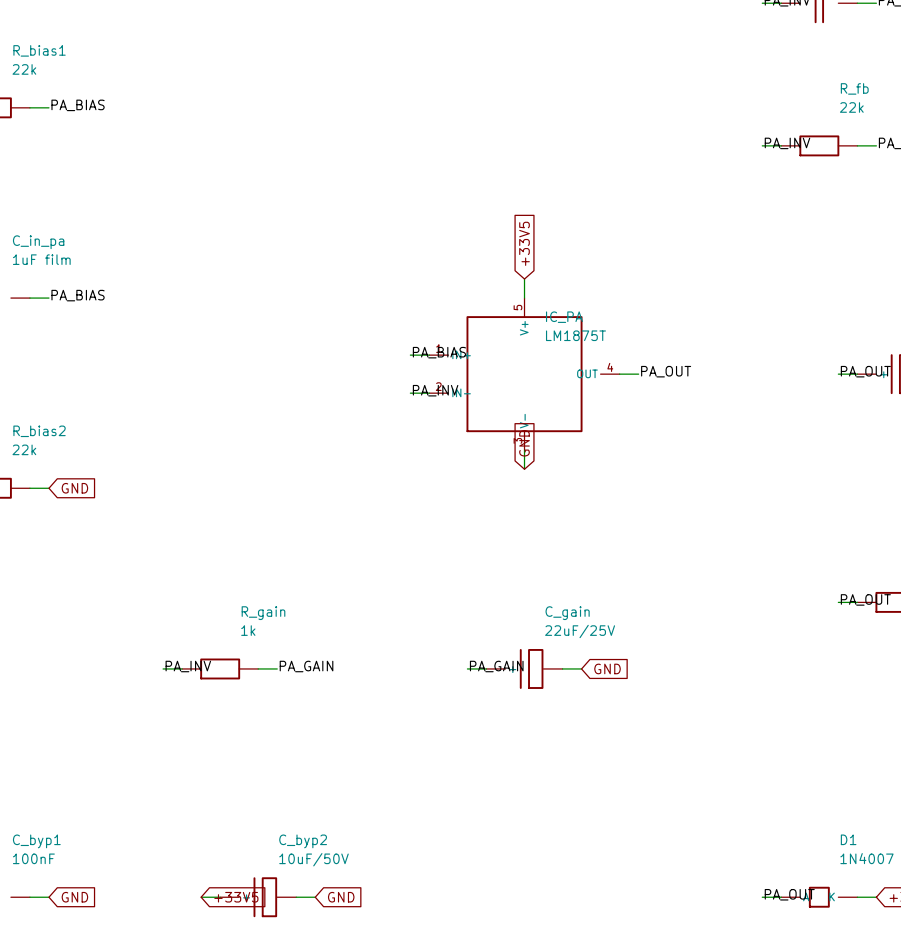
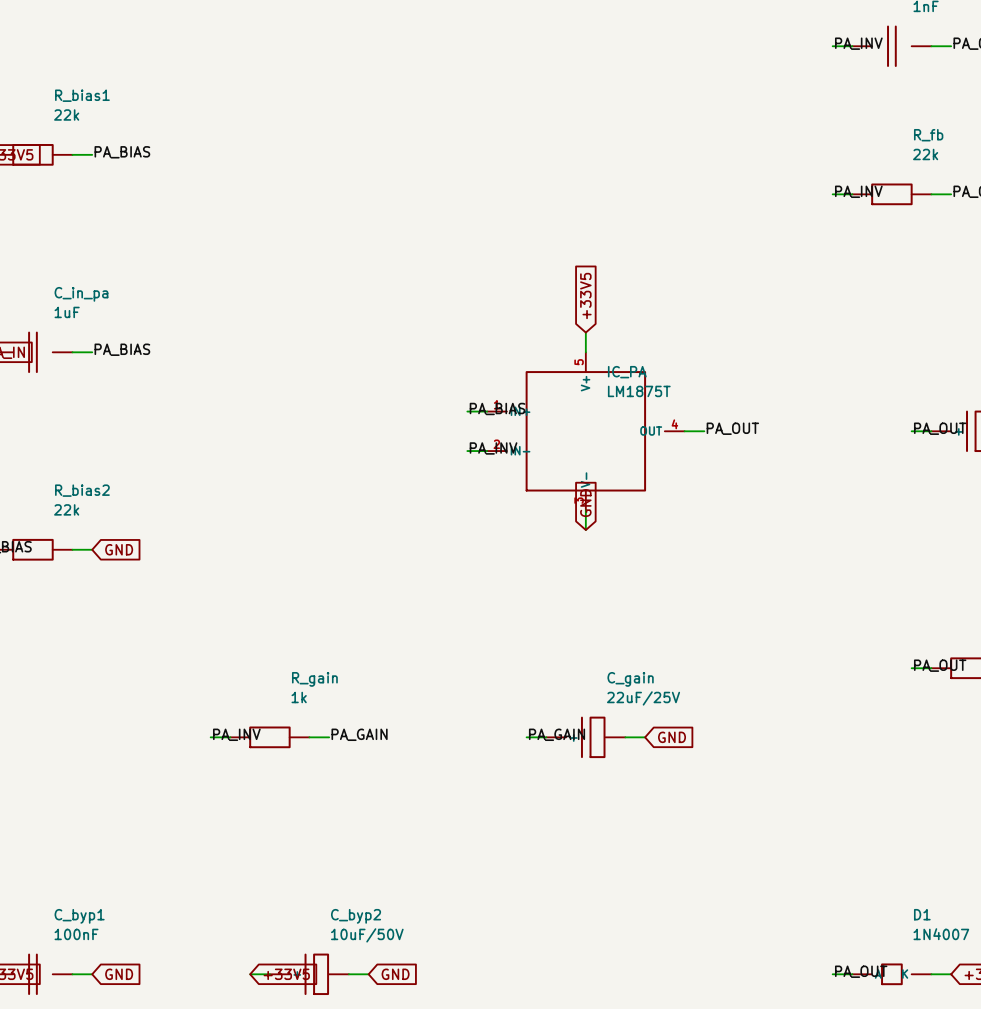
C_in_pa value: 1uF film (41, 259) -> 1uF (67, 312)

